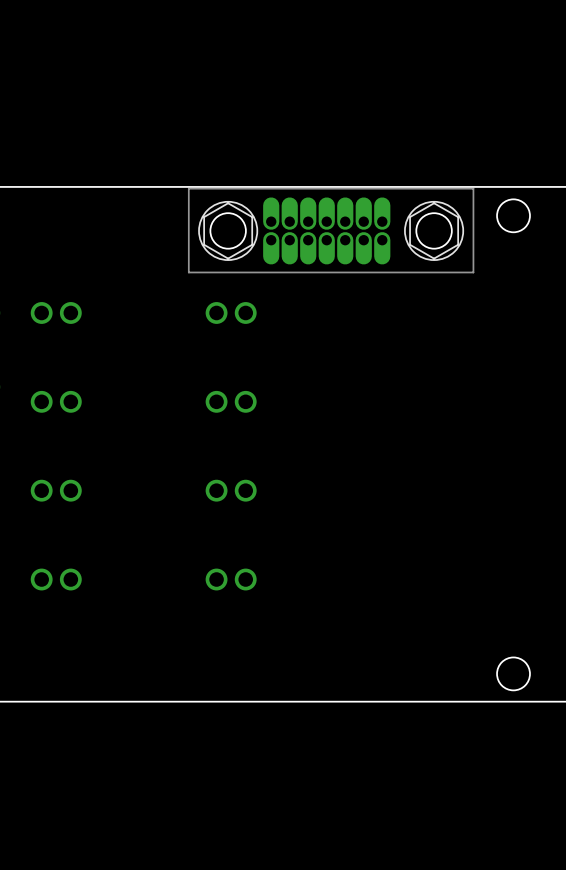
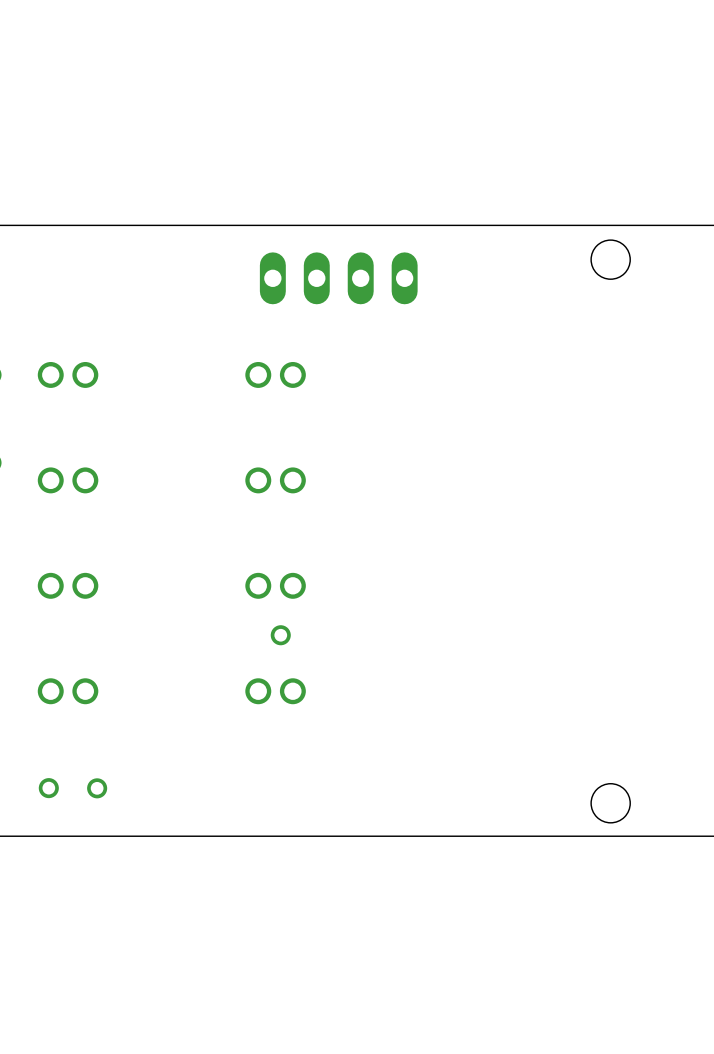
part: (331, 230) -> none
part: none -> (338, 278)
part: none -> (280, 635)
part: none -> (48, 788)
part: none -> (97, 788)

